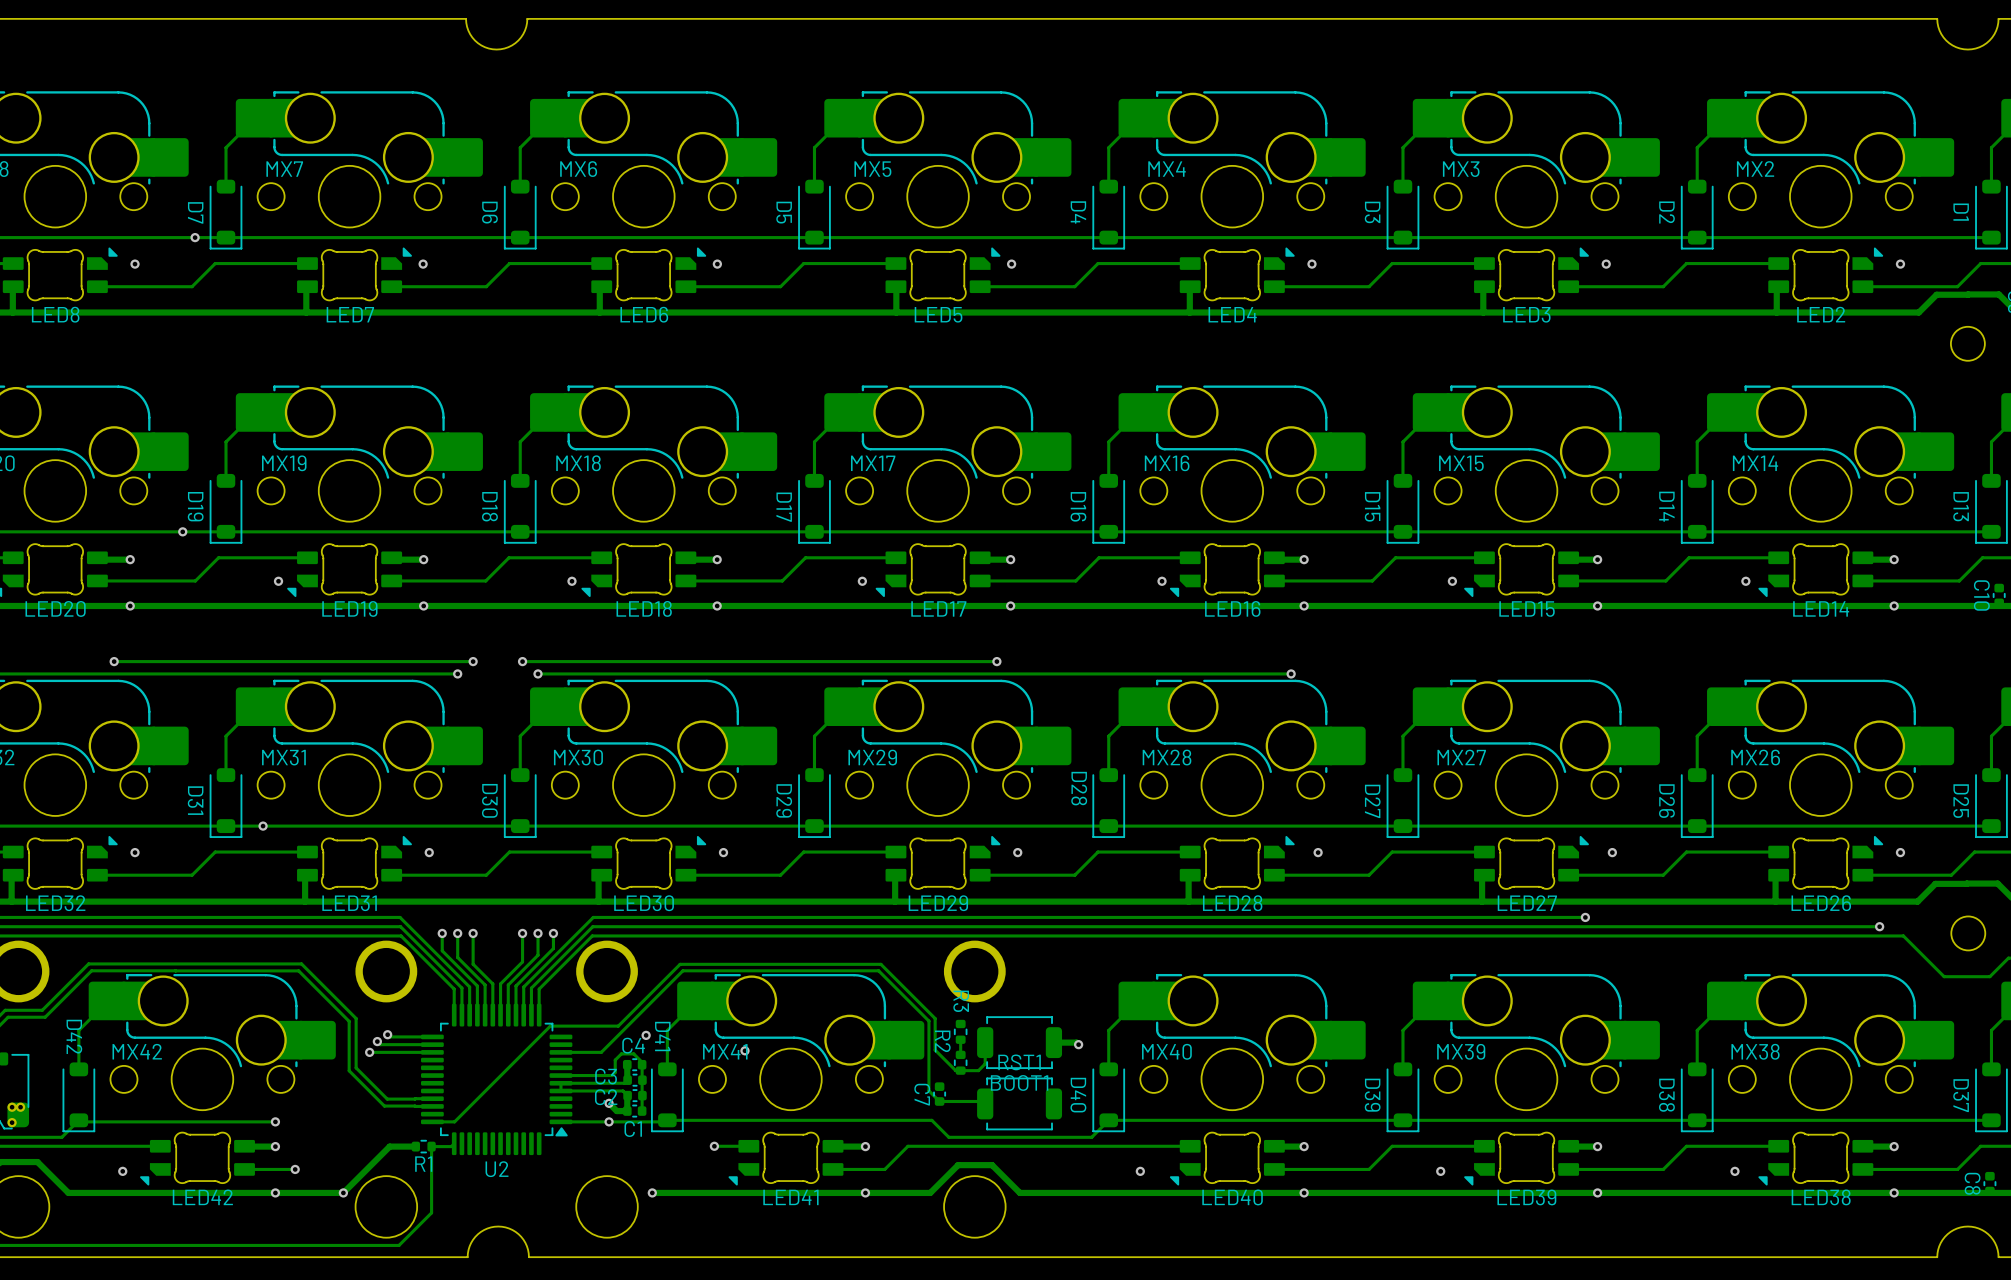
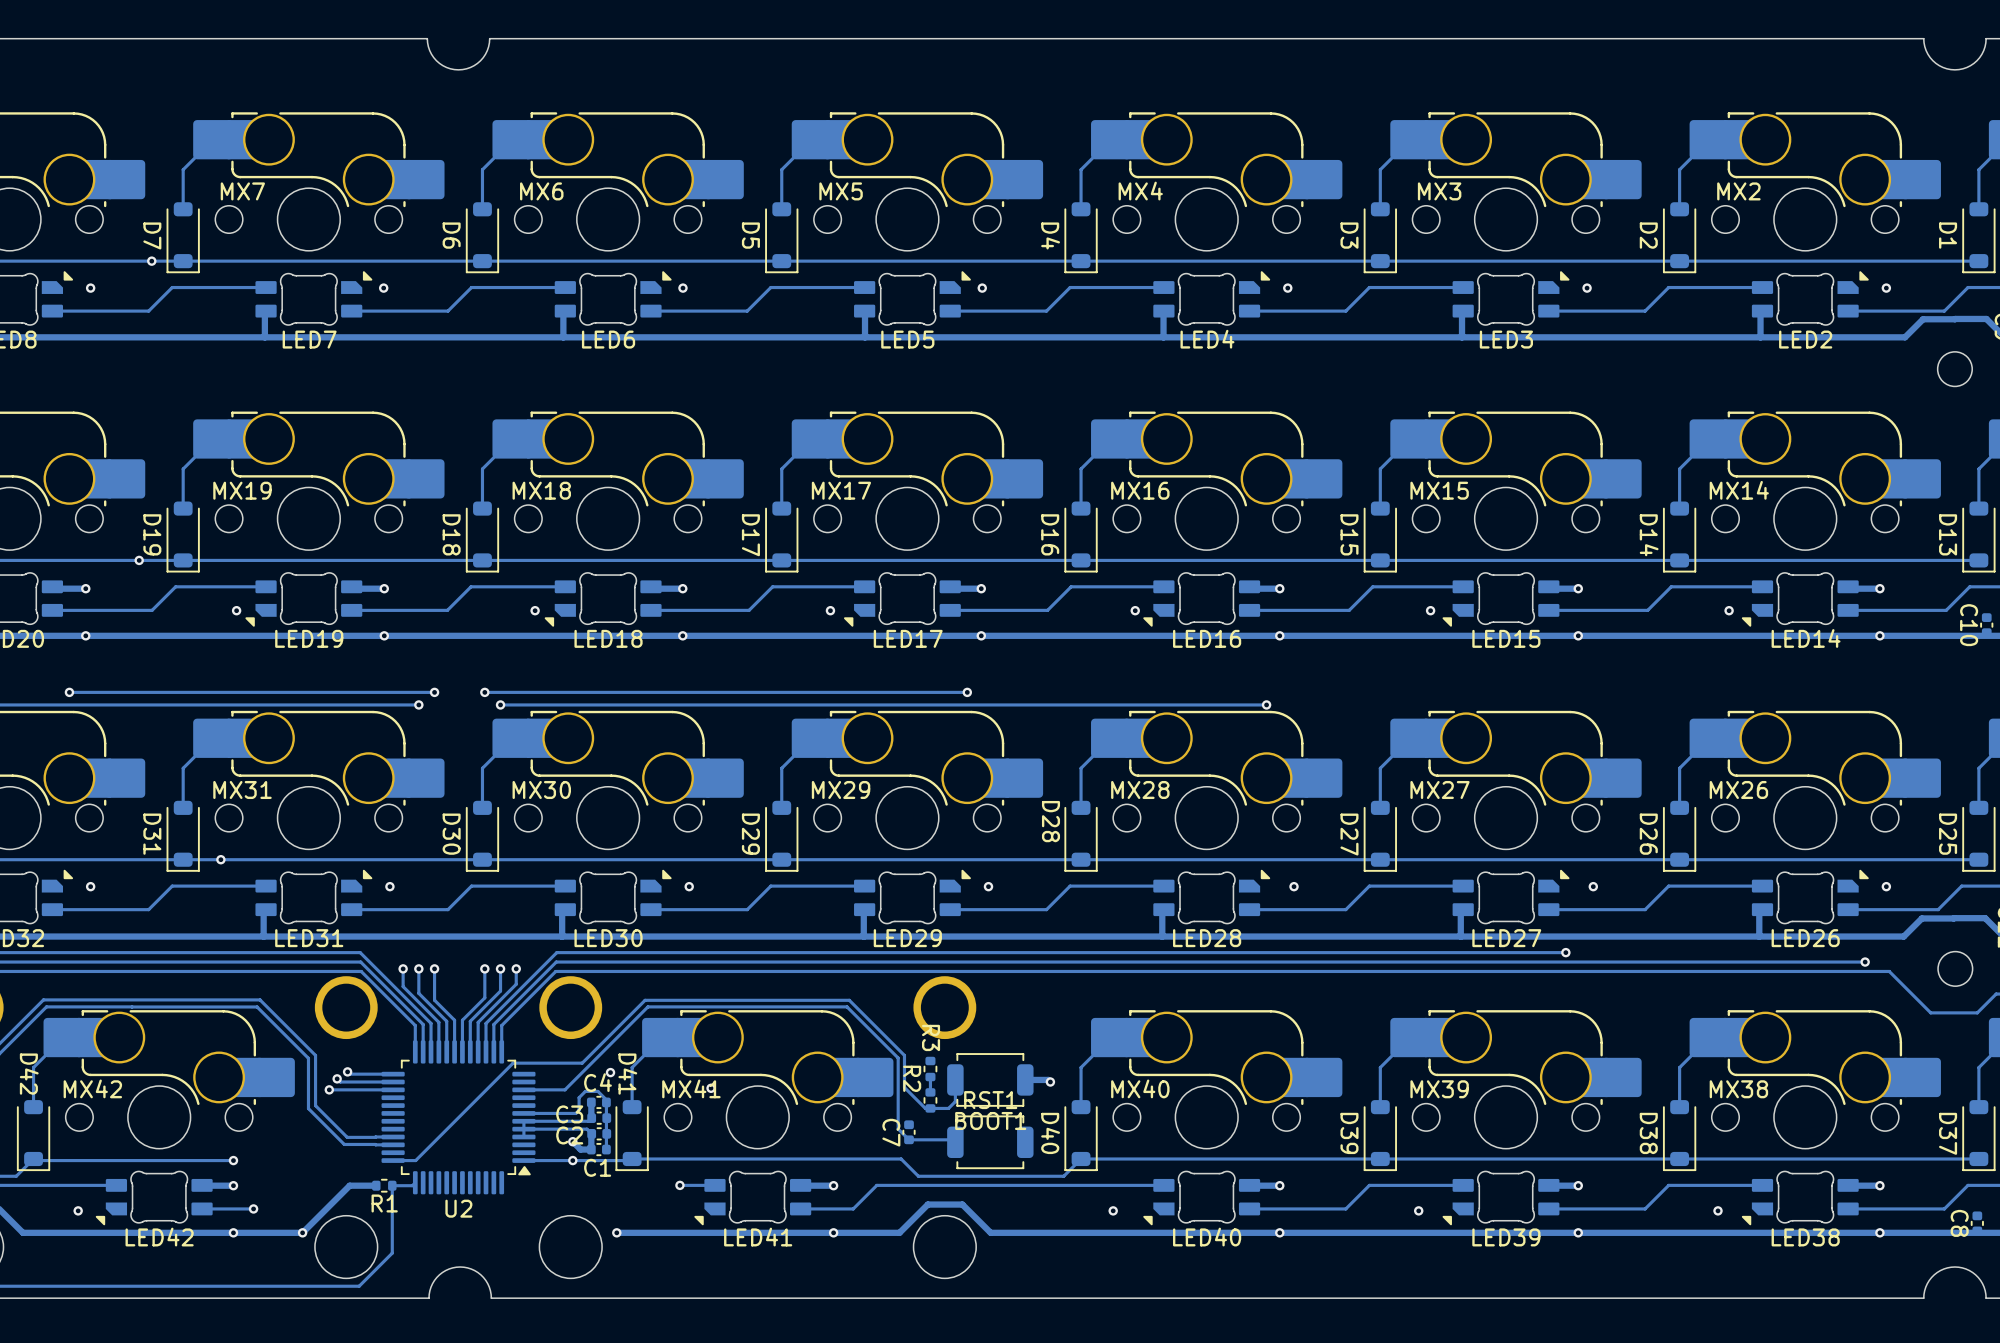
track: none -> (523, 1129) (523, 1136)

